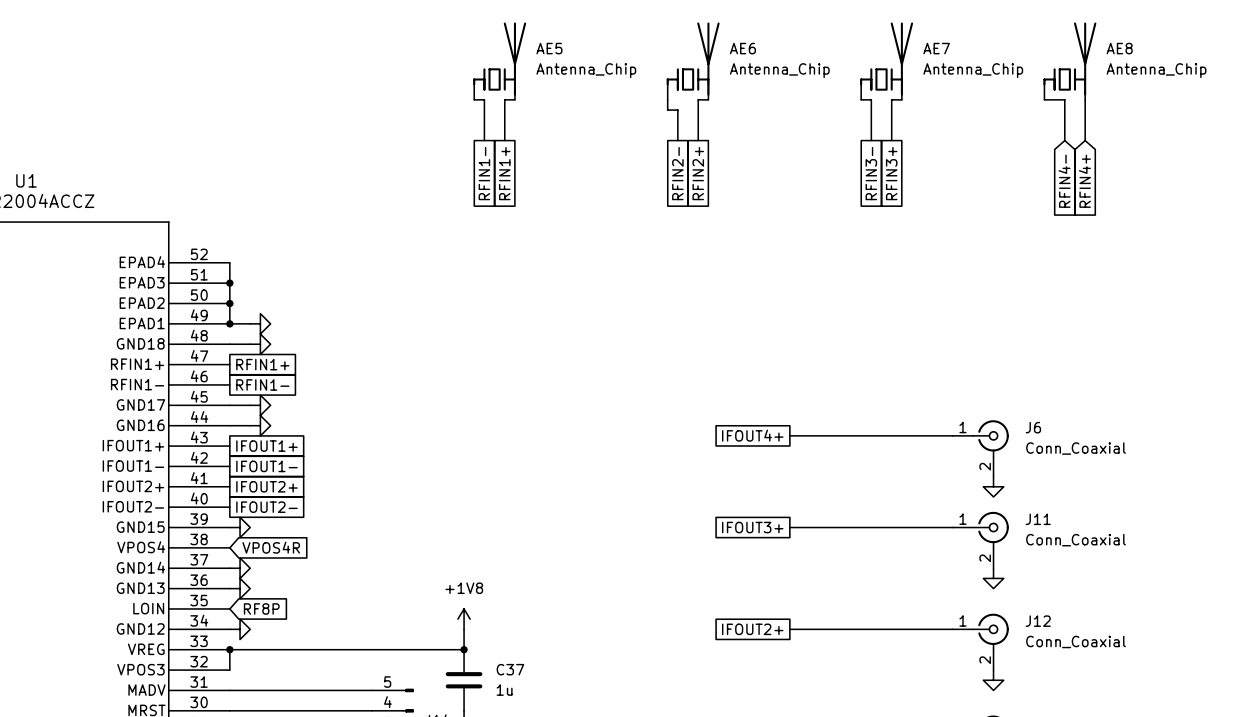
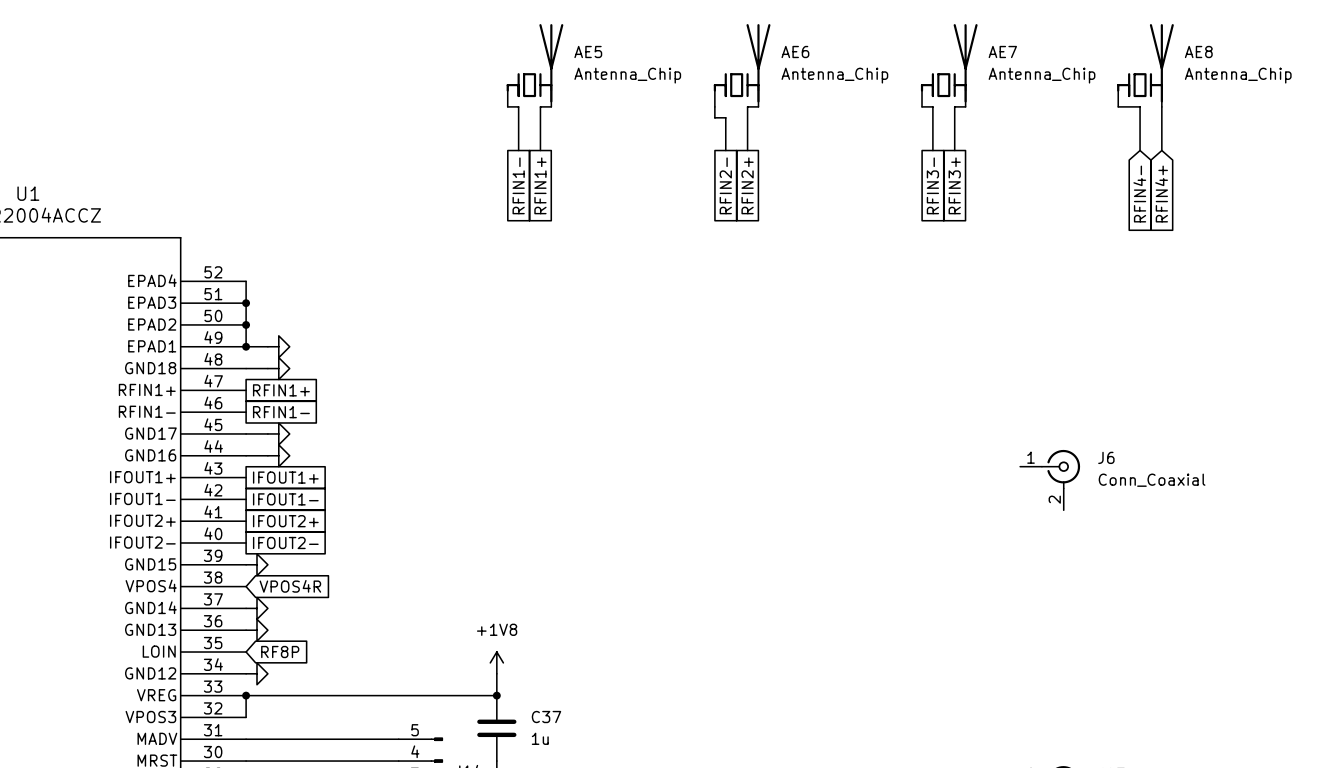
global label: IFOUT4+ (752, 435) -> none
wire: (789, 435) (952, 435) -> none
power symbol: (993, 486) -> none
global label: IFOUT3+ (752, 527) -> none
wire: (789, 527) (952, 527) -> none
J11: Conn_Coaxial (980, 540) -> none
power symbol: (993, 578) -> none
global label: IFOUT2+ (752, 629) -> none
wire: (789, 629) (952, 629) -> none
J12: Conn_Coaxial (980, 641) -> none
power symbol: (993, 680) -> none

